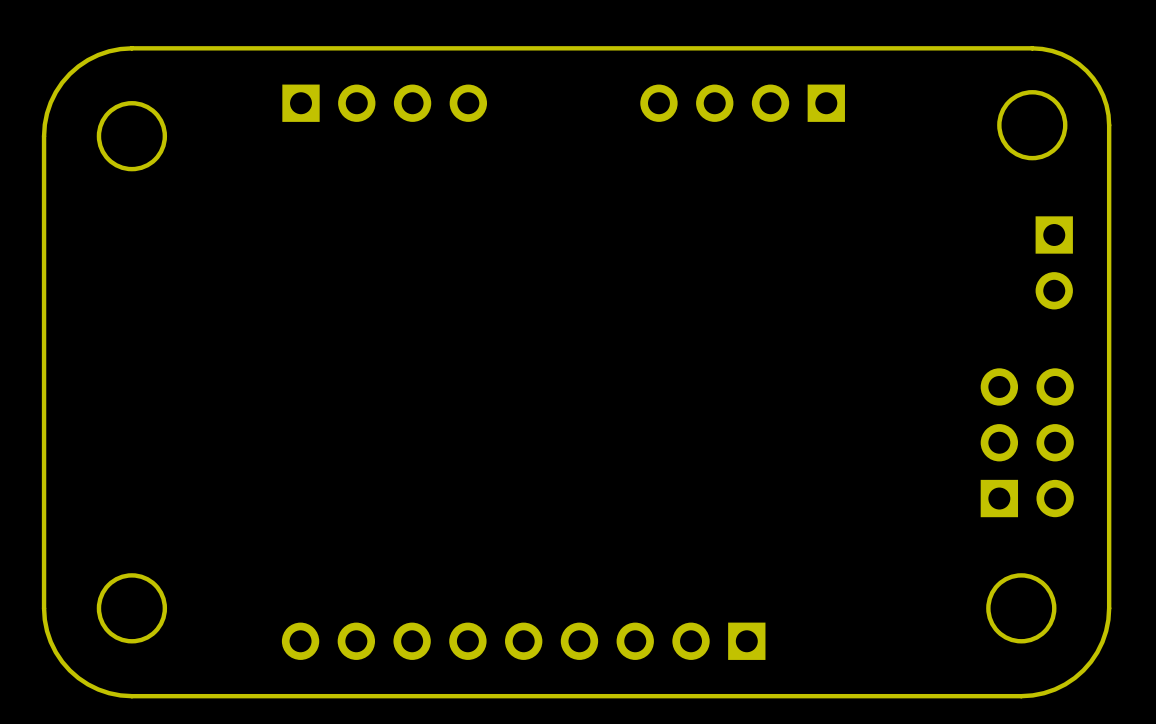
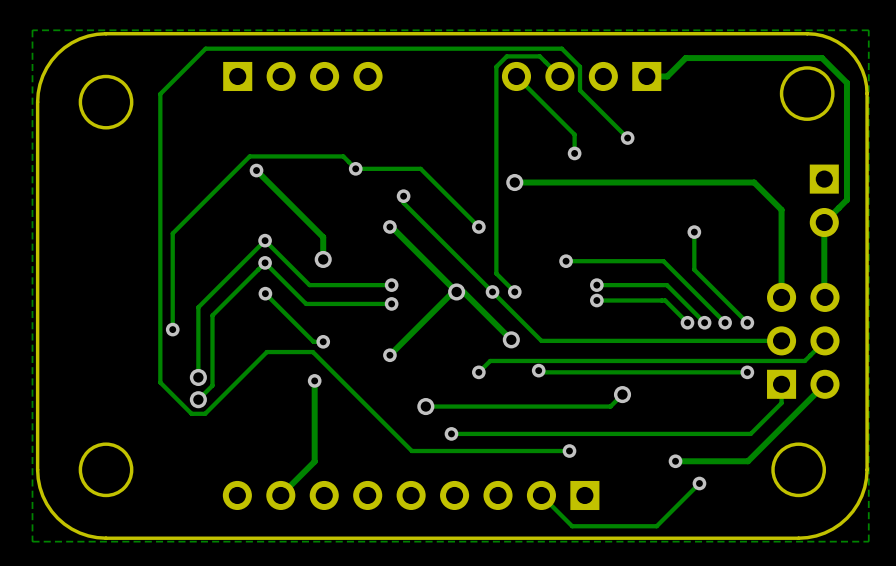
zone outline: none -> (868, 30) (868, 541) (32, 541) (32, 30) (868, 30)
track: none -> (516, 76) (574, 134) (574, 153)
track: none -> (559, 76) (539, 56) (506, 56) (496, 66) (496, 273) (514, 291)
track: none -> (646, 76) (667, 76) (685, 58) (822, 58) (846, 82) (846, 199) (824, 222) (824, 297)
track: none -> (627, 138) (580, 90) (580, 66) (561, 48) (205, 48) (160, 94) (160, 382) (191, 413) (205, 413) (266, 352) (312, 352) (411, 451) (569, 451)
via: none -> (627, 138)
via: none -> (574, 153)
via: none -> (355, 168)
track: none -> (256, 170) (323, 237) (323, 259)
via: none -> (256, 170)
track: none -> (514, 182) (754, 182) (781, 209) (781, 297)
via: none -> (514, 182)
track: none -> (403, 196) (403, 203) (541, 340) (781, 340)
via: none -> (403, 196)
track: none -> (389, 226) (456, 291)
via: none -> (389, 226)
track: none -> (478, 226) (420, 168) (355, 168) (343, 156) (249, 156) (172, 233) (172, 329)
via: none -> (478, 226)
track: none -> (694, 232) (694, 269) (747, 322)
via: none -> (694, 232)
via: none -> (265, 240)
via: none -> (323, 259)
track: none -> (566, 261) (663, 261) (725, 322)
via: none -> (566, 261)
via: none -> (265, 262)
track: none -> (391, 285) (309, 285) (265, 240) (198, 307) (198, 377)
via: none -> (391, 285)
track: none -> (596, 285) (666, 285) (704, 322)
via: none -> (596, 285)
via: none -> (456, 291)
via: none -> (492, 291)
via: none -> (514, 291)
track: none -> (265, 293) (313, 341) (323, 341)
via: none -> (265, 293)
track: none -> (596, 300) (665, 300) (687, 322)
via: none -> (596, 300)
track: none -> (391, 303) (306, 303) (265, 262) (212, 315) (212, 385) (198, 399)
via: none -> (391, 303)
via: none -> (687, 322)
via: none -> (704, 322)
via: none -> (725, 322)
via: none -> (747, 322)
via: none -> (172, 329)
track: none -> (511, 339) (463, 291) (453, 291) (389, 355)
via: none -> (511, 339)
track: none -> (824, 340) (804, 360) (490, 360) (478, 372)
via: none -> (323, 341)
via: none -> (389, 355)
track: none -> (538, 370) (540, 372) (747, 372)
via: none -> (538, 370)
via: none -> (478, 372)
via: none -> (747, 372)
via: none -> (198, 377)
track: none -> (314, 380) (314, 461) (280, 495)
via: none -> (314, 380)
track: none -> (781, 384) (781, 403) (750, 433) (451, 433)
track: none -> (824, 384) (748, 461) (675, 461)
track: none -> (622, 394) (610, 406) (425, 406)
via: none -> (622, 394)
via: none -> (198, 399)
via: none -> (425, 406)
via: none -> (451, 433)
via: none -> (569, 451)
via: none -> (675, 461)
track: none -> (699, 483) (656, 526) (572, 526) (541, 495)
via: none -> (699, 483)

